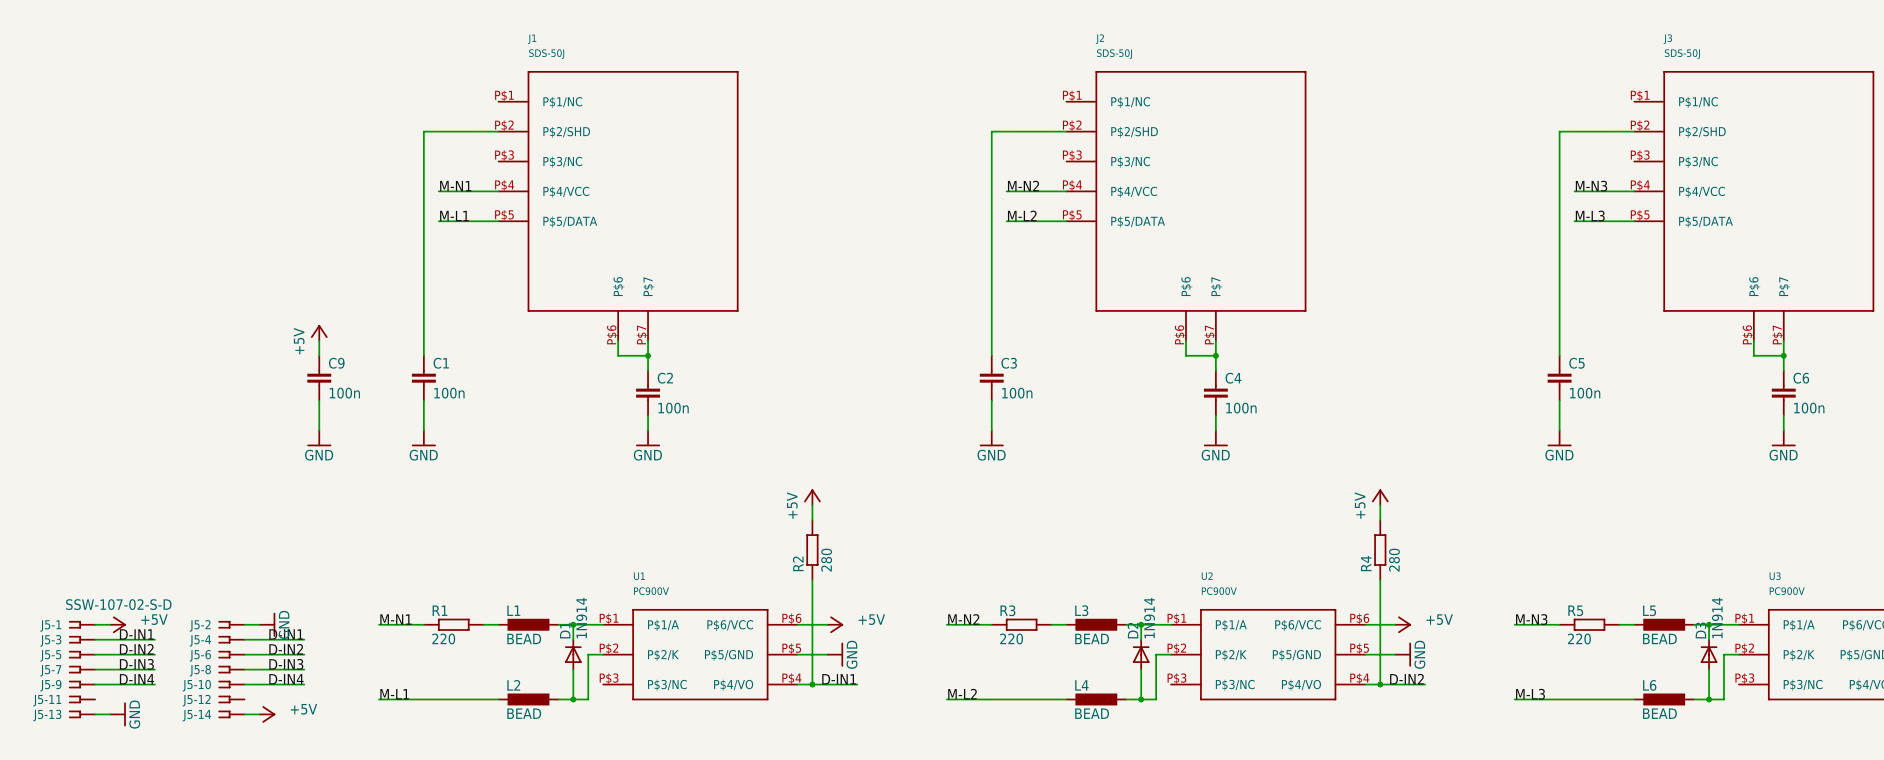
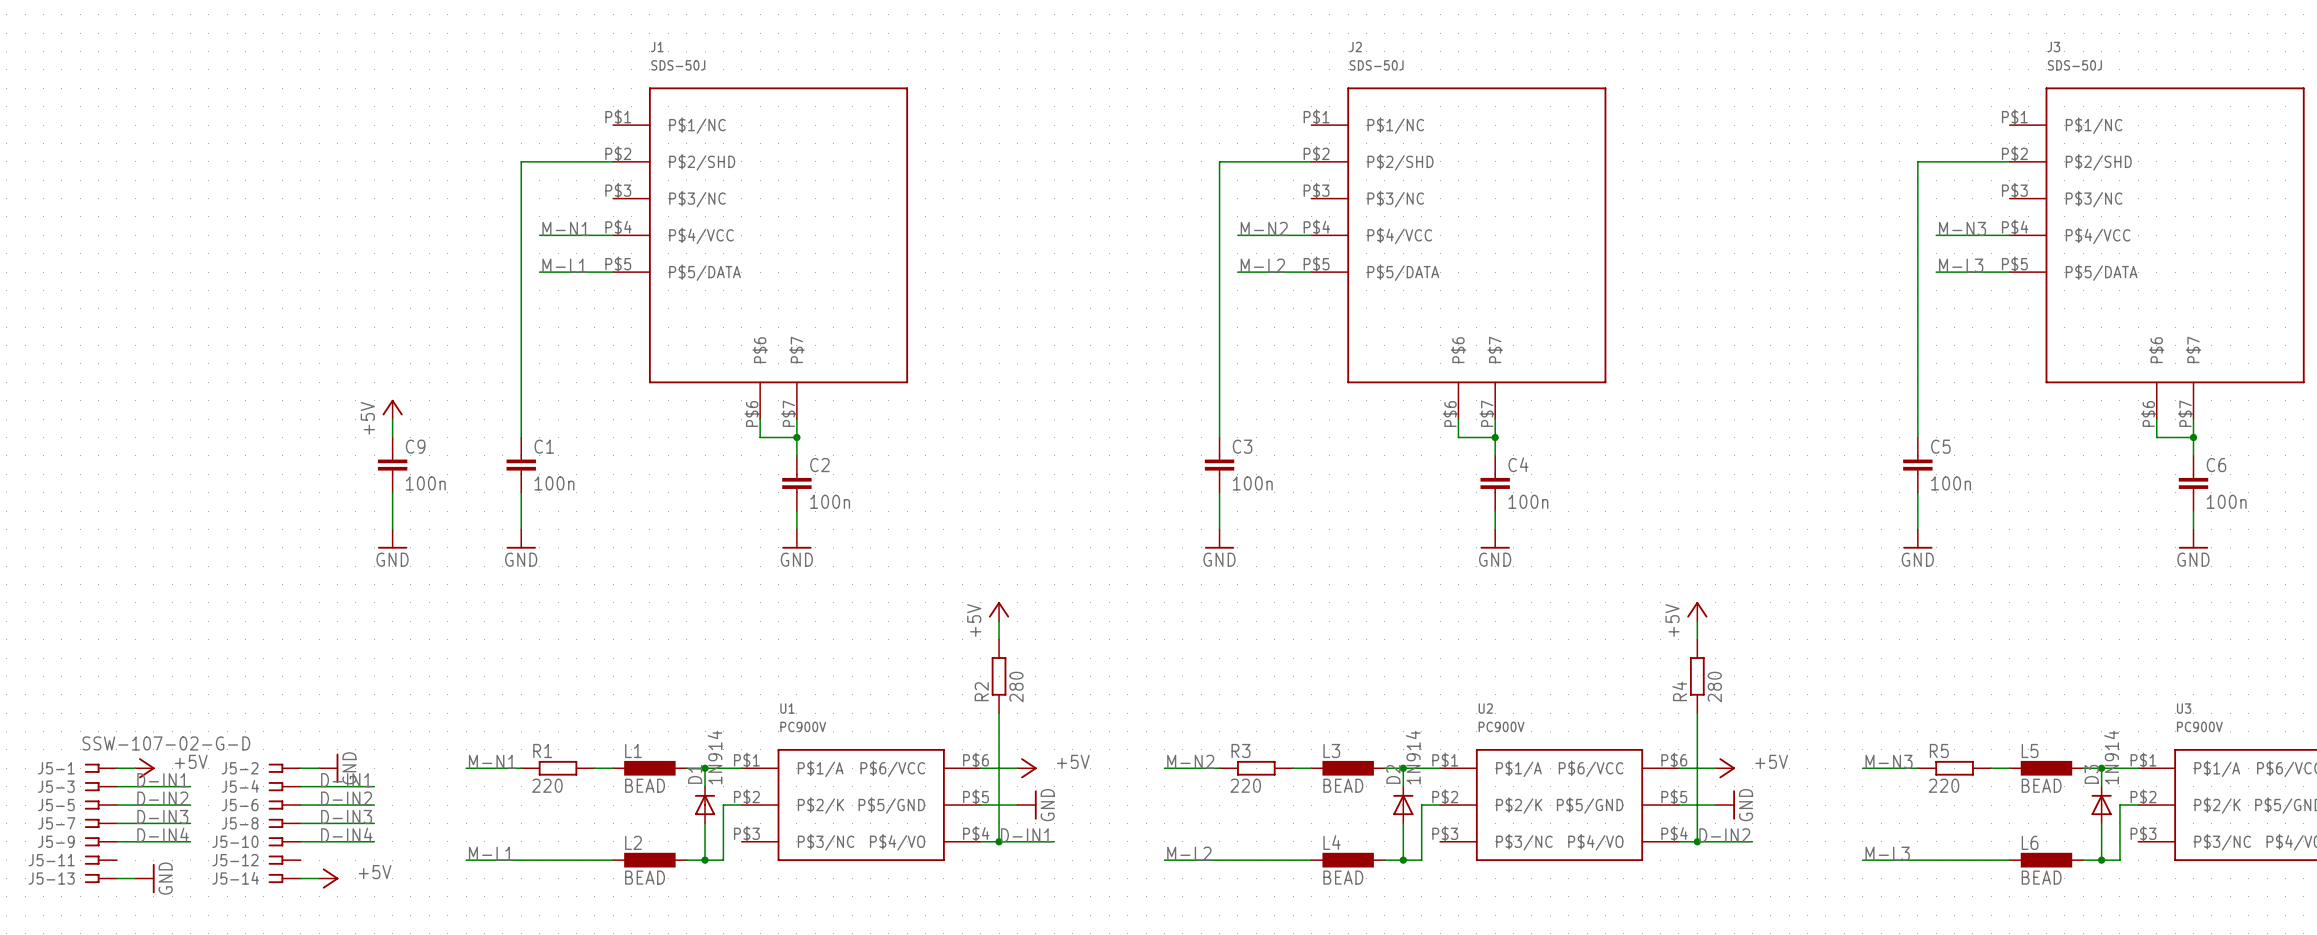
J5-1 value: SSW-107-02-S-D (118, 604) -> SSW-107-02-G-D (166, 743)

